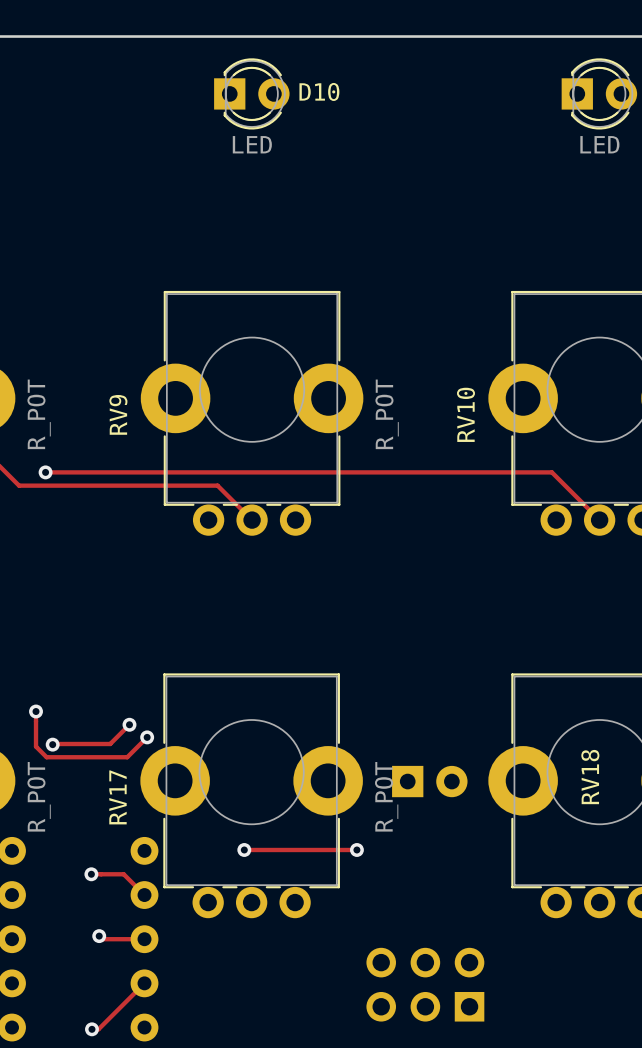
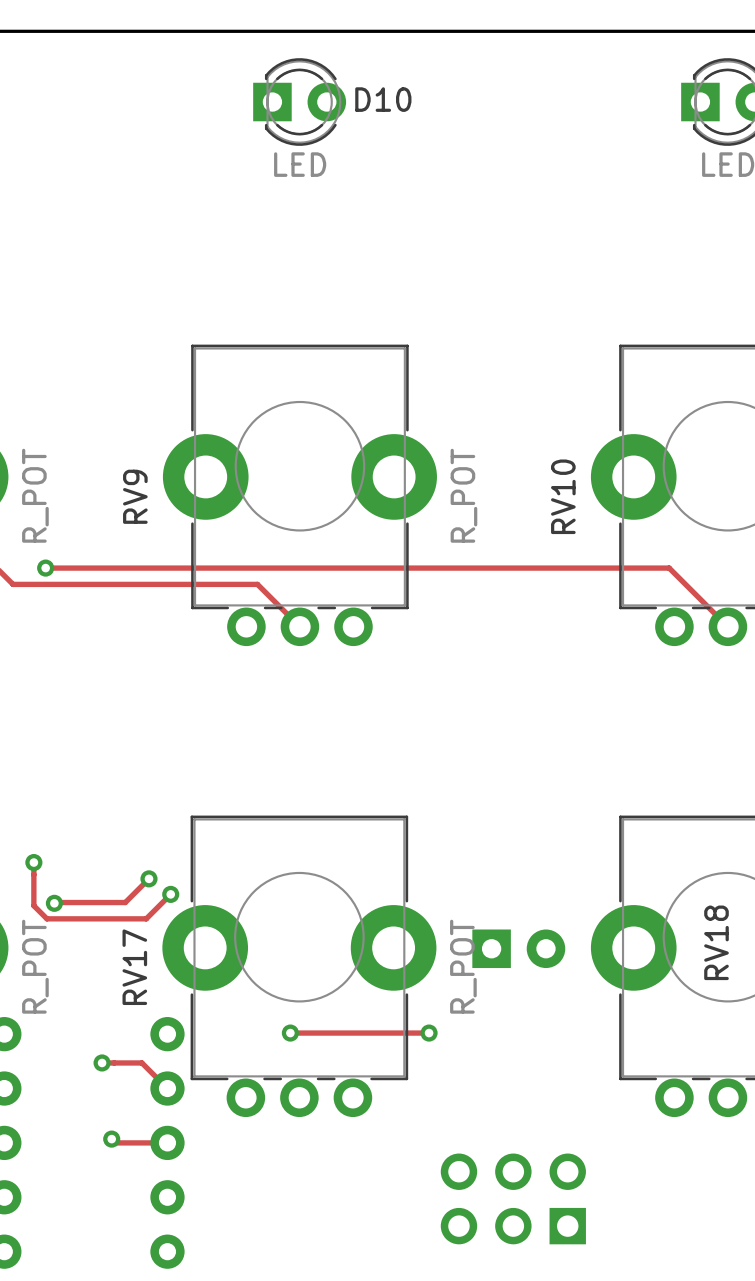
track: (144, 983) (98, 1029) (91, 1029) -> none
via: (91, 1029) -> none

